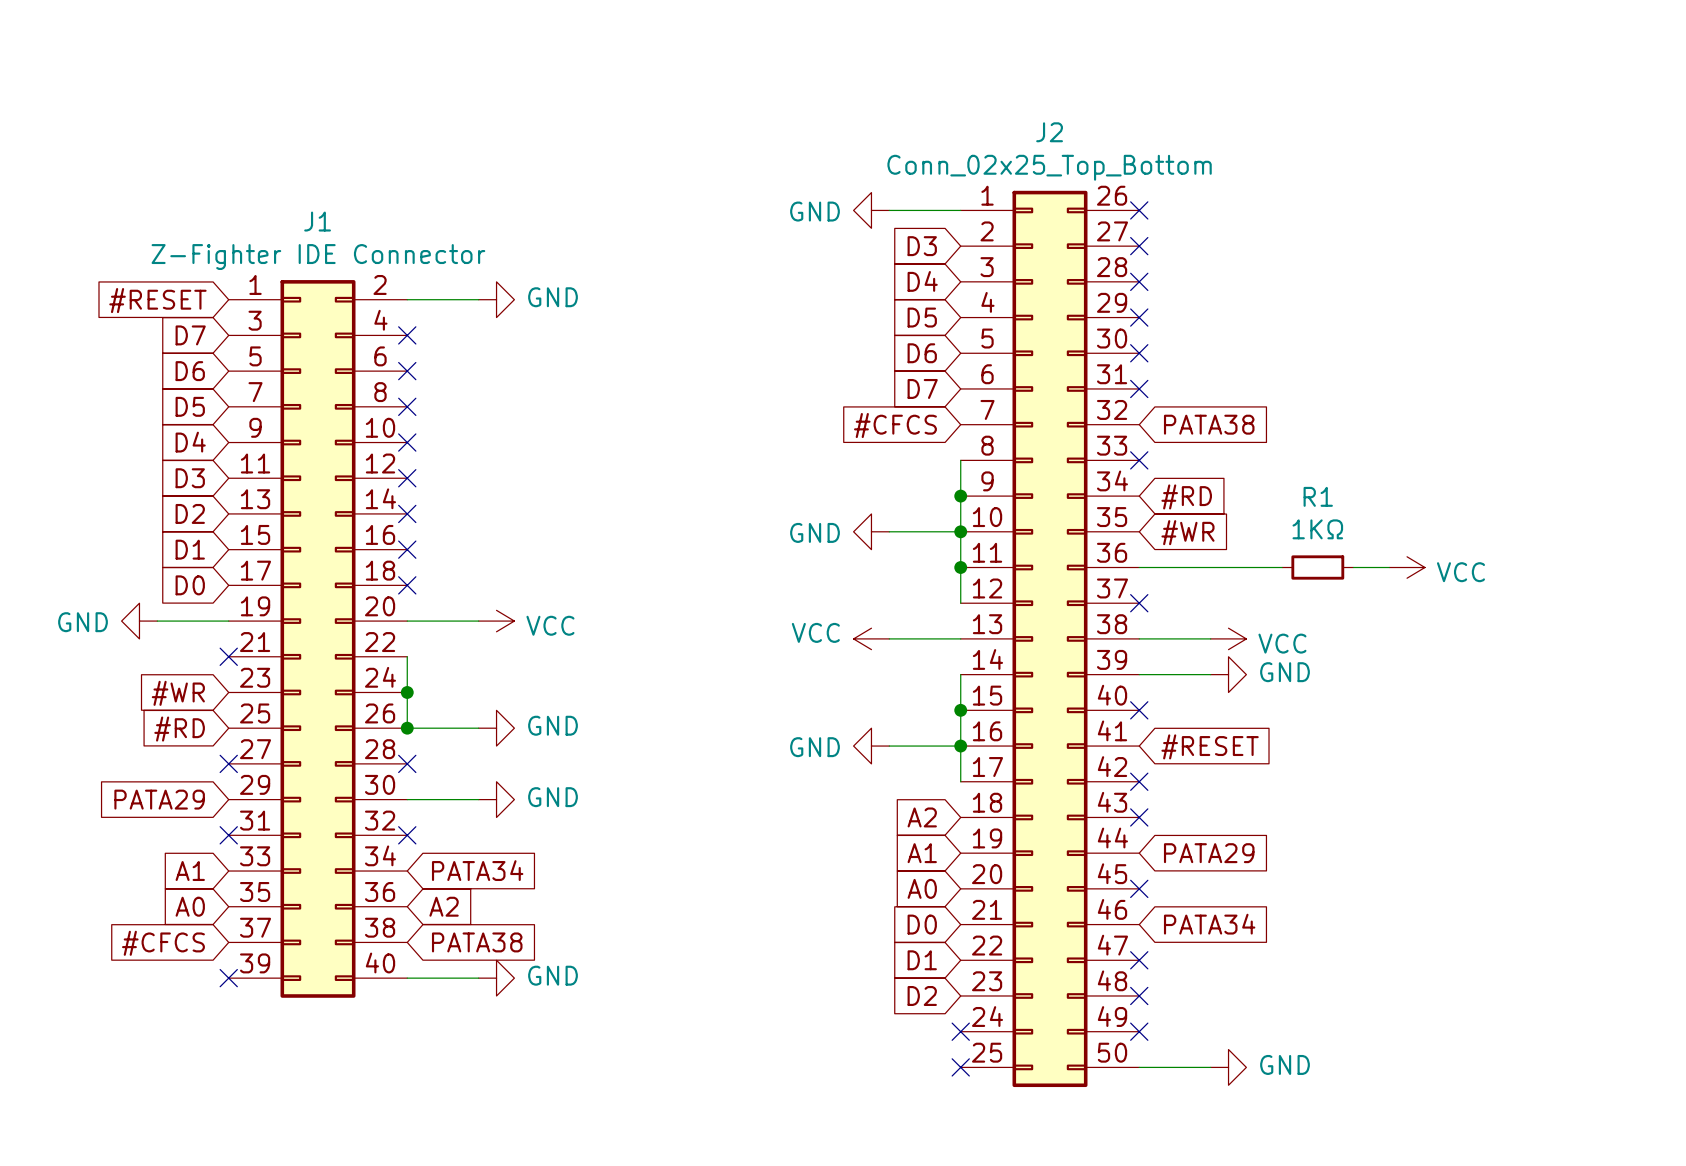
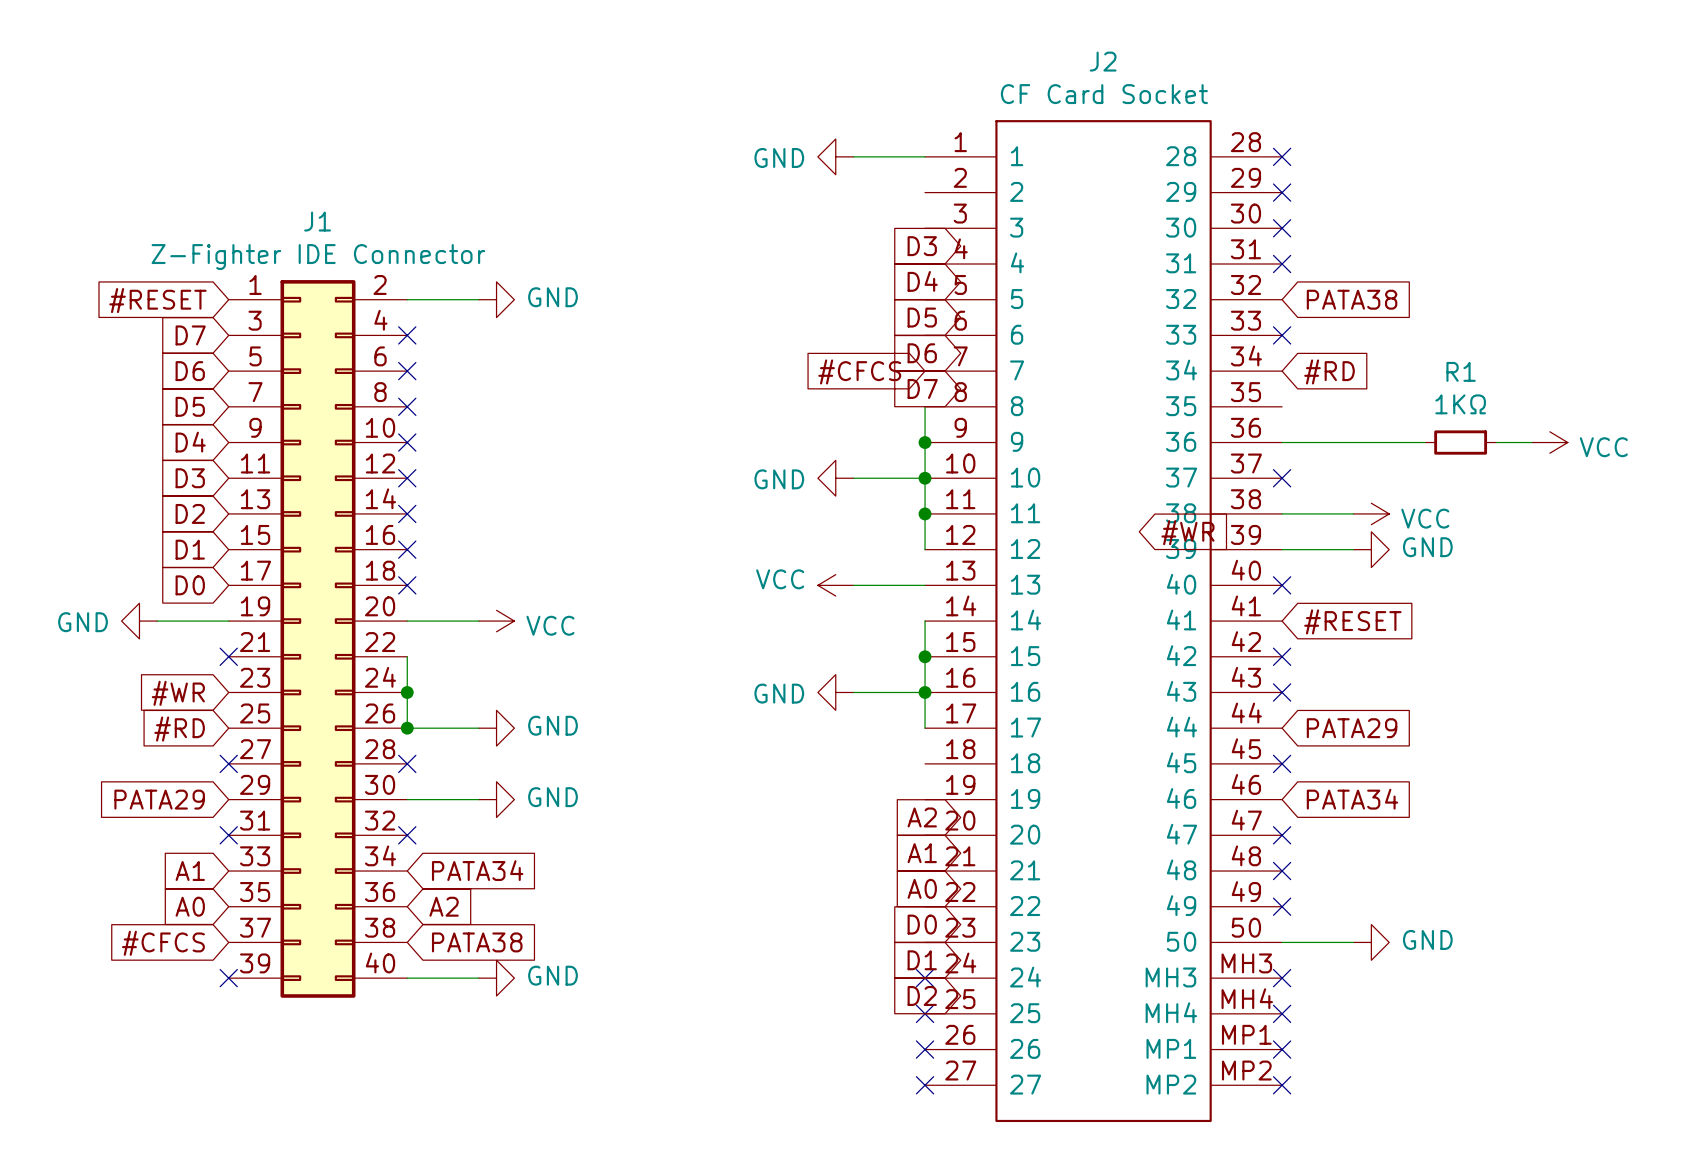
J2 name position: J2 (1049, 132) -> J2 (1103, 61)
no-connect mark: none -> (1282, 156)
J2 value: Conn_02x25_Top_Bottom (1049, 167) -> CF Card Socket (1104, 94)
J2 symbol: [960, 190, 1140, 1088] -> [925, 120, 1283, 1123]
no-connect mark: none -> (1282, 192)
power symbol position: GND (871, 210) -> GND (835, 156)
wire: (889, 210) (960, 210) -> (853, 156) (925, 156)
no-connect mark: (1139, 210) -> none
no-connect mark: none -> (1282, 228)
no-connect mark: (1139, 246) -> none
no-connect mark: none -> (1282, 263)
no-connect mark: (1139, 281) -> none
no-connect mark: (1139, 317) -> none
no-connect mark: none -> (1282, 335)
no-connect mark: (1139, 353) -> none
no-connect mark: (1139, 388) -> none
global label position: PATA38 (1209, 424) -> PATA38 (1352, 299)
global label position: #CFCS (895, 425) -> #CFCS (859, 371)
junction: none -> (925, 442)
power symbol: none -> VCC (1549, 442)
wire: (960, 460) (960, 603) -> (925, 406) (925, 549)
no-connect mark: (1139, 460) -> none
junction: none -> (925, 478)
no-connect mark: none -> (1282, 478)
junction: (960, 496) -> none
global label position: #RD (1186, 496) -> #RD (1329, 371)
junction: none -> (925, 513)
power symbol position: GND (871, 531) -> GND (835, 478)
wire: (889, 531) (960, 531) -> (853, 478) (925, 478)
junction: (960, 531) -> none
power symbol: none -> GND (1371, 549)
junction: (960, 567) -> none
wire: (1139, 567) (1282, 567) -> (1282, 442) (1424, 442)
R1 position: (1317, 567) -> (1460, 442)
wire: (1353, 567) (1389, 567) -> (1496, 442) (1532, 442)
power symbol position: VCC (1407, 567) -> VCC (1371, 513)
no-connect mark: none -> (1282, 585)
no-connect mark: (1139, 603) -> none
power symbol position: VCC (871, 638) -> VCC (835, 585)
wire: (889, 638) (960, 638) -> (853, 585) (925, 585)
wire: (1139, 638) (1210, 638) -> (1282, 513) (1353, 513)
power symbol: VCC (1228, 638) -> none
junction: none -> (925, 656)
no-connect mark: none -> (1282, 656)
wire: (960, 674) (960, 781) -> (925, 621) (925, 728)
wire: (1139, 674) (1210, 674) -> (1282, 549) (1353, 549)
power symbol: GND (1228, 674) -> none
junction: none -> (925, 692)
no-connect mark: none -> (1282, 692)
junction: (960, 710) -> none
no-connect mark: (1139, 710) -> none
power symbol position: GND (871, 746) -> GND (835, 692)
wire: (889, 746) (960, 746) -> (853, 692) (925, 692)
junction: (960, 746) -> none
global label position: #RESET (1210, 746) -> #RESET (1352, 621)
no-connect mark: none -> (1282, 763)
no-connect mark: (1139, 781) -> none
no-connect mark: (1139, 817) -> none
no-connect mark: none -> (1282, 835)
global label position: PATA29 (1209, 853) -> PATA29 (1352, 728)
no-connect mark: none -> (1282, 871)
no-connect mark: (1139, 888) -> none
no-connect mark: none -> (1282, 906)
global label position: PATA34 (1209, 924) -> PATA34 (1352, 799)
power symbol: none -> GND (1371, 942)
no-connect mark: (1139, 960) -> none
no-connect mark: none -> (925, 978)
no-connect mark: none -> (1282, 978)
no-connect mark: (1139, 995) -> none
no-connect mark: none -> (925, 1013)
no-connect mark: none -> (1282, 1013)
no-connect mark: (960, 1031) -> none
no-connect mark: (1139, 1031) -> none
no-connect mark: none -> (925, 1049)
no-connect mark: none -> (1282, 1049)
no-connect mark: (960, 1067) -> none
wire: (1139, 1067) (1210, 1067) -> (1282, 942) (1353, 942)
power symbol: GND (1228, 1067) -> none
no-connect mark: none -> (925, 1085)
no-connect mark: none -> (1282, 1085)

